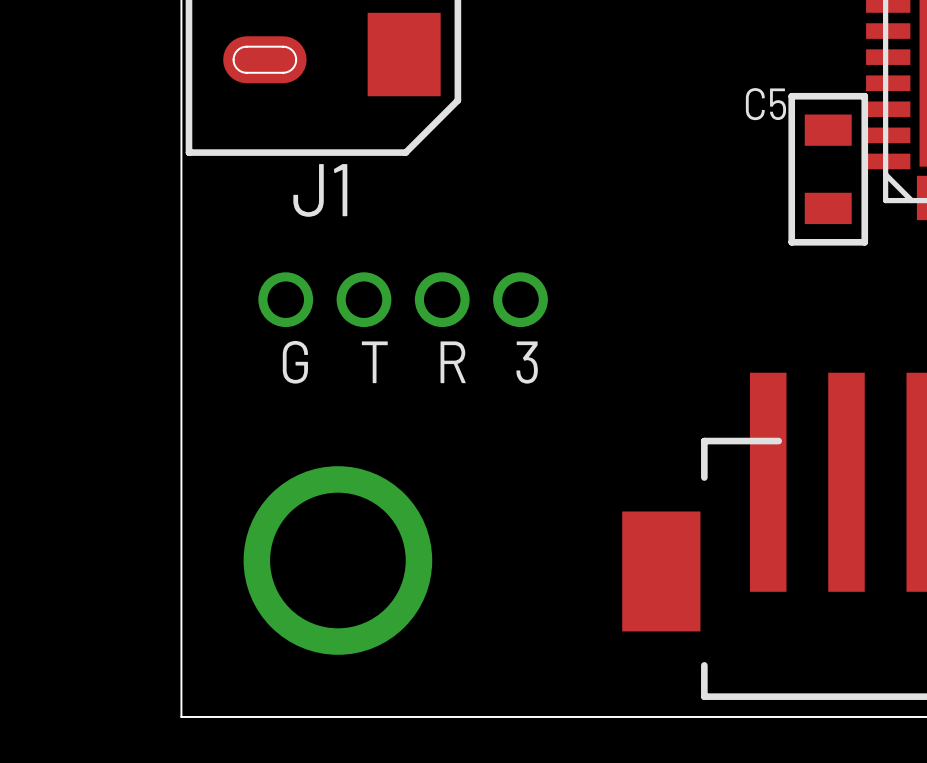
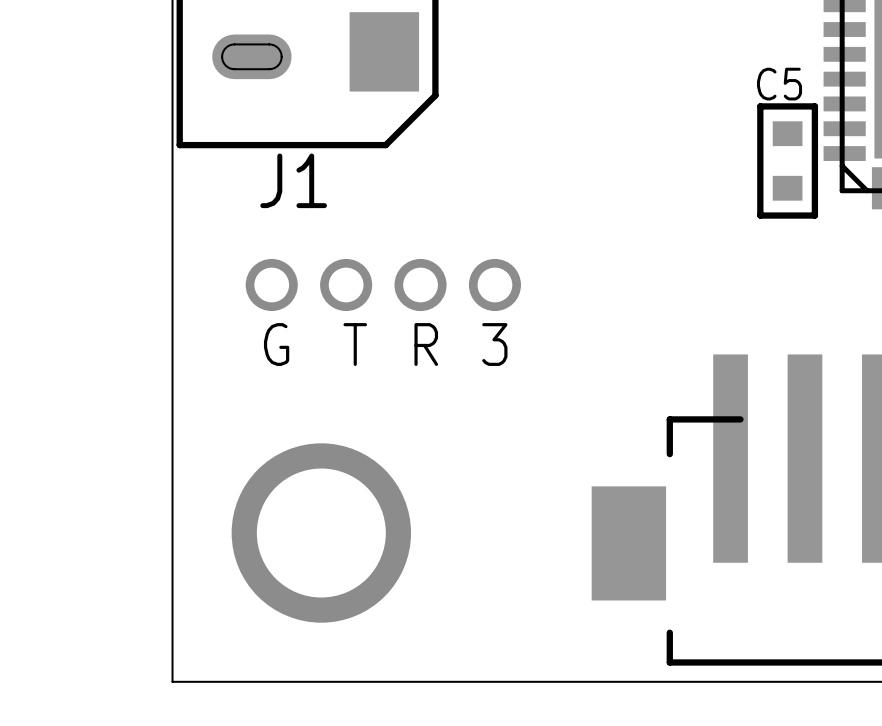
C5 footprint: [788, 92, 869, 246] -> [757, 103, 819, 219]
C5 name position: C5 (765, 104) -> C5 (779, 84)

